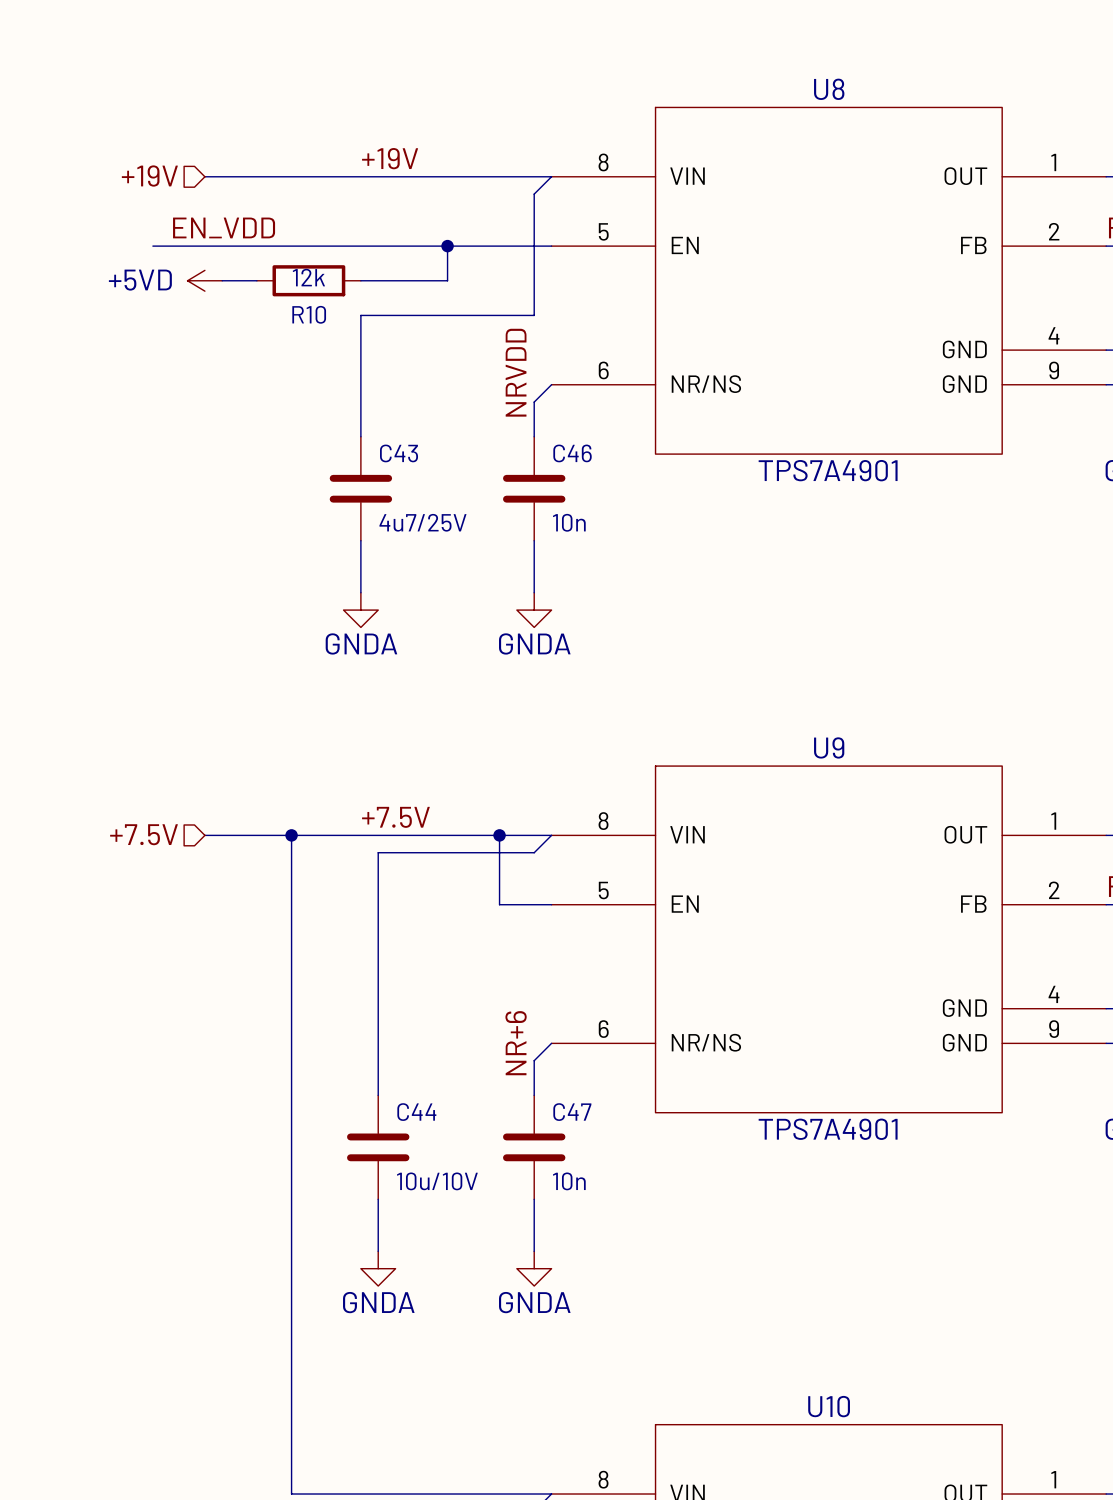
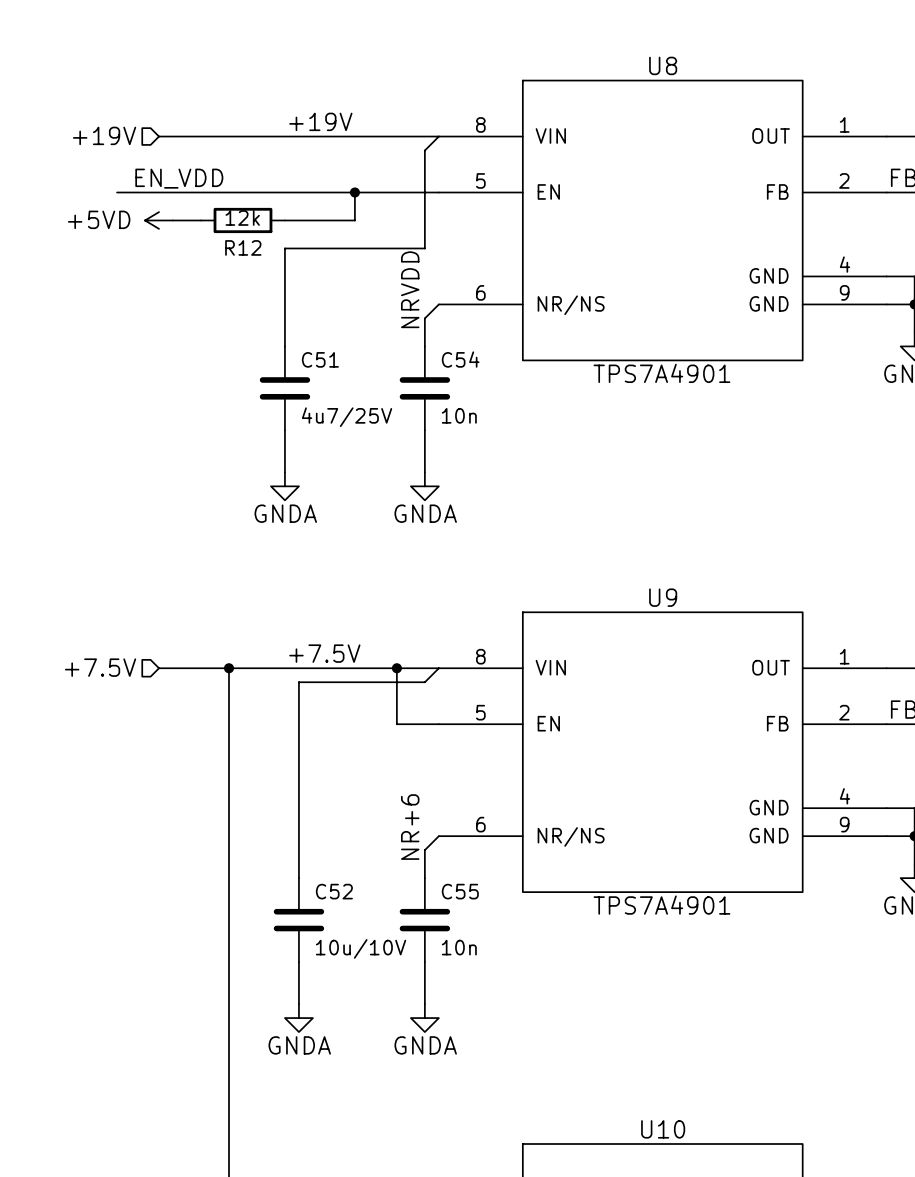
R10 name: R10 (309, 314) -> R12 (243, 247)
C43 name: C43 (399, 453) -> C51 (320, 359)
C46 name: C46 (572, 453) -> C54 (460, 359)
C44 name: C44 (416, 1112) -> C52 (334, 891)
C47 name: C47 (572, 1112) -> C55 (460, 891)

